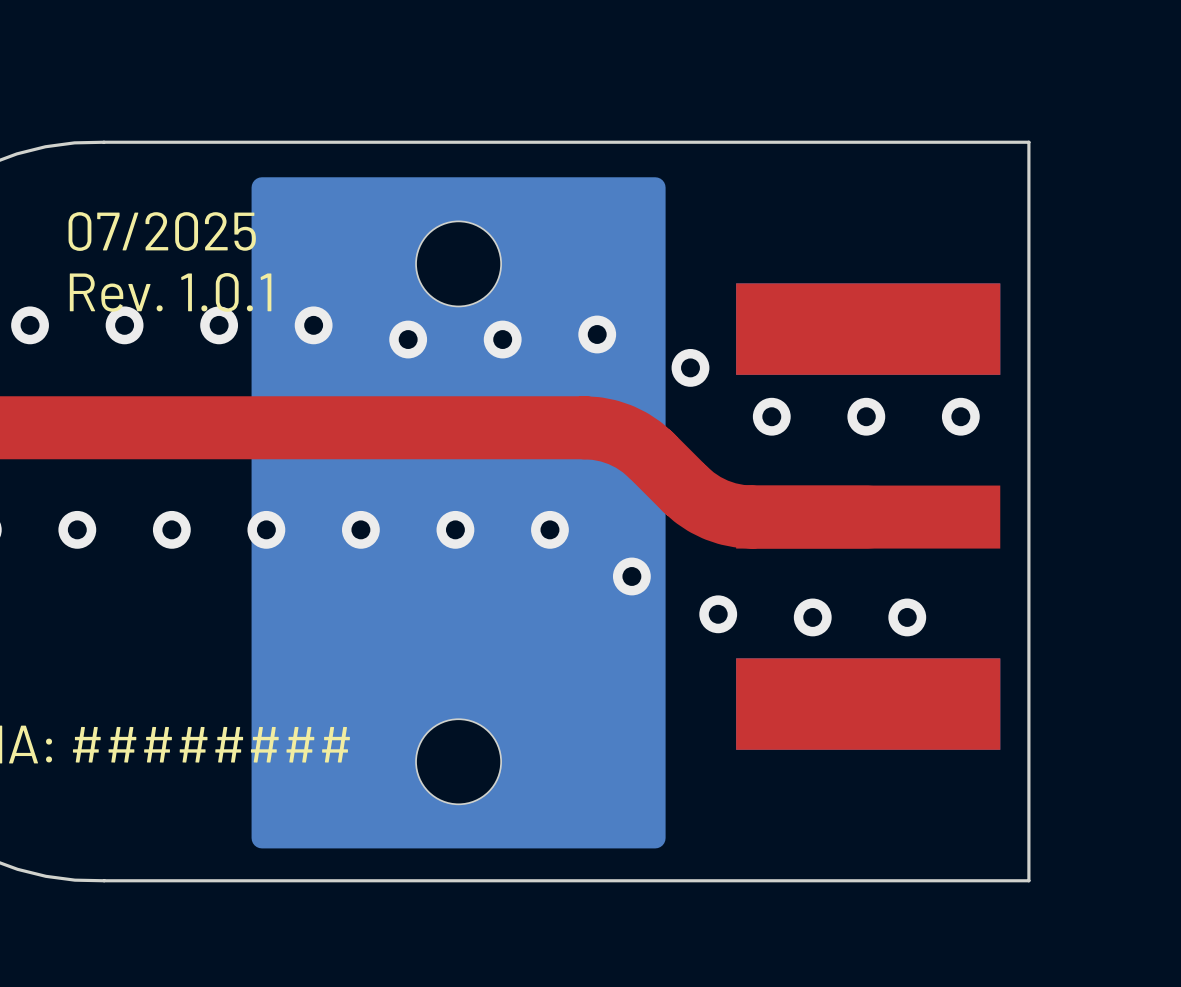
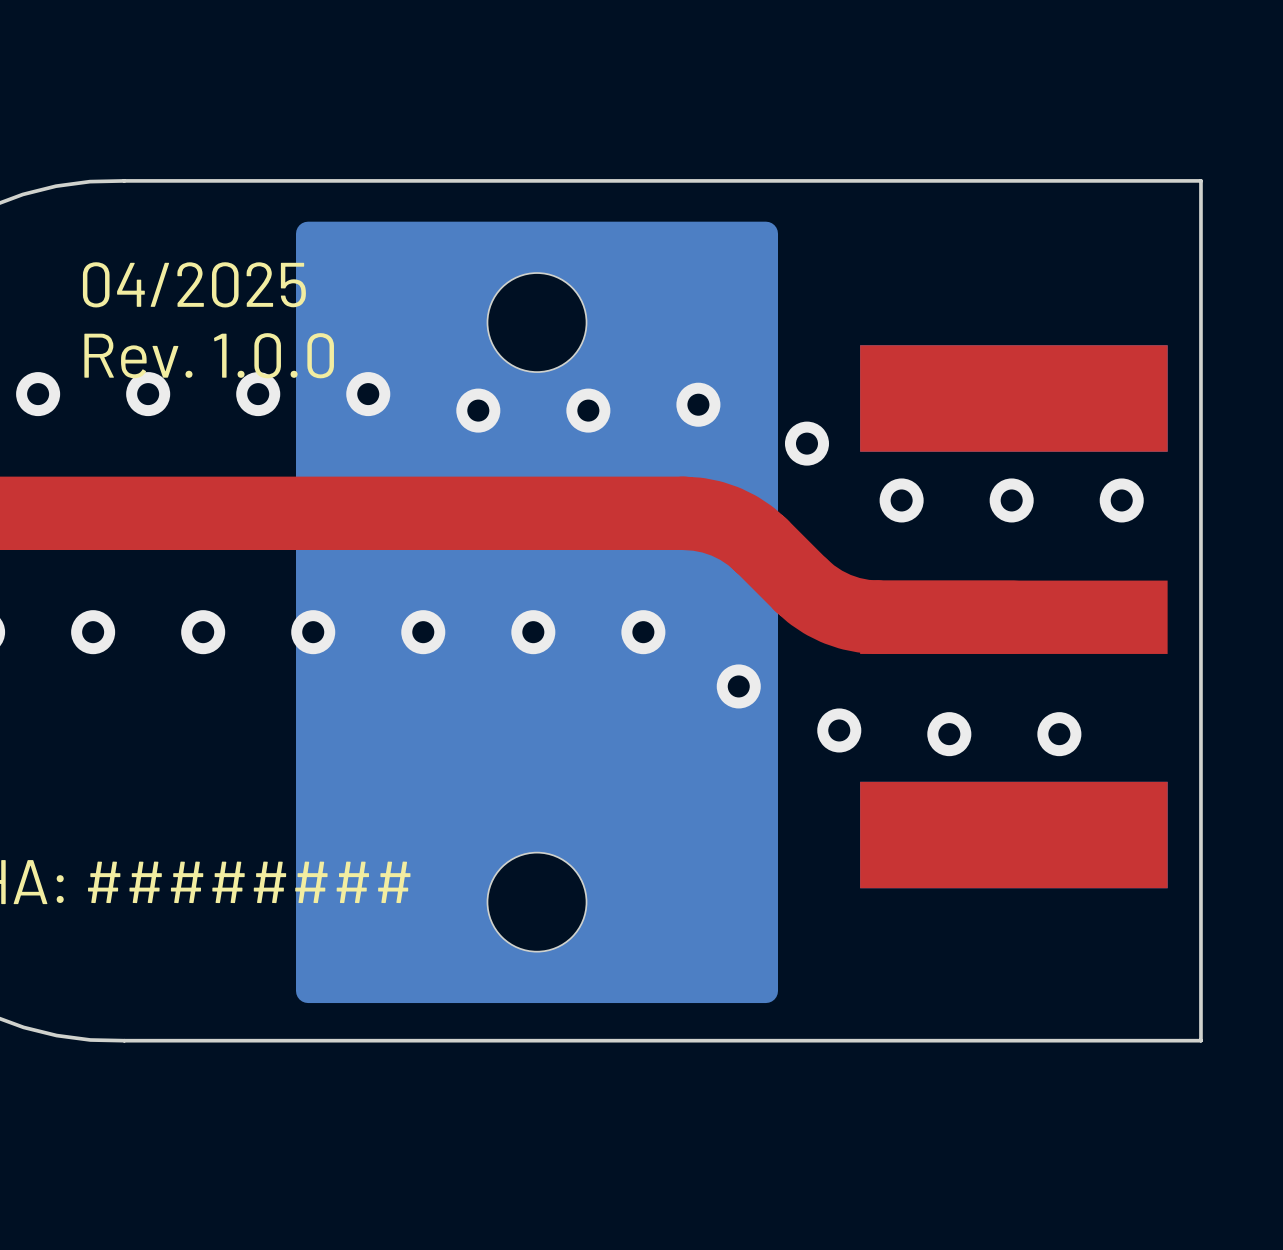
text: 07/2025 (162, 231) -> 04/2025 (194, 284)
text: Rev. 1.0.1 (170, 292) -> Rev. 1.0.0 (209, 355)

